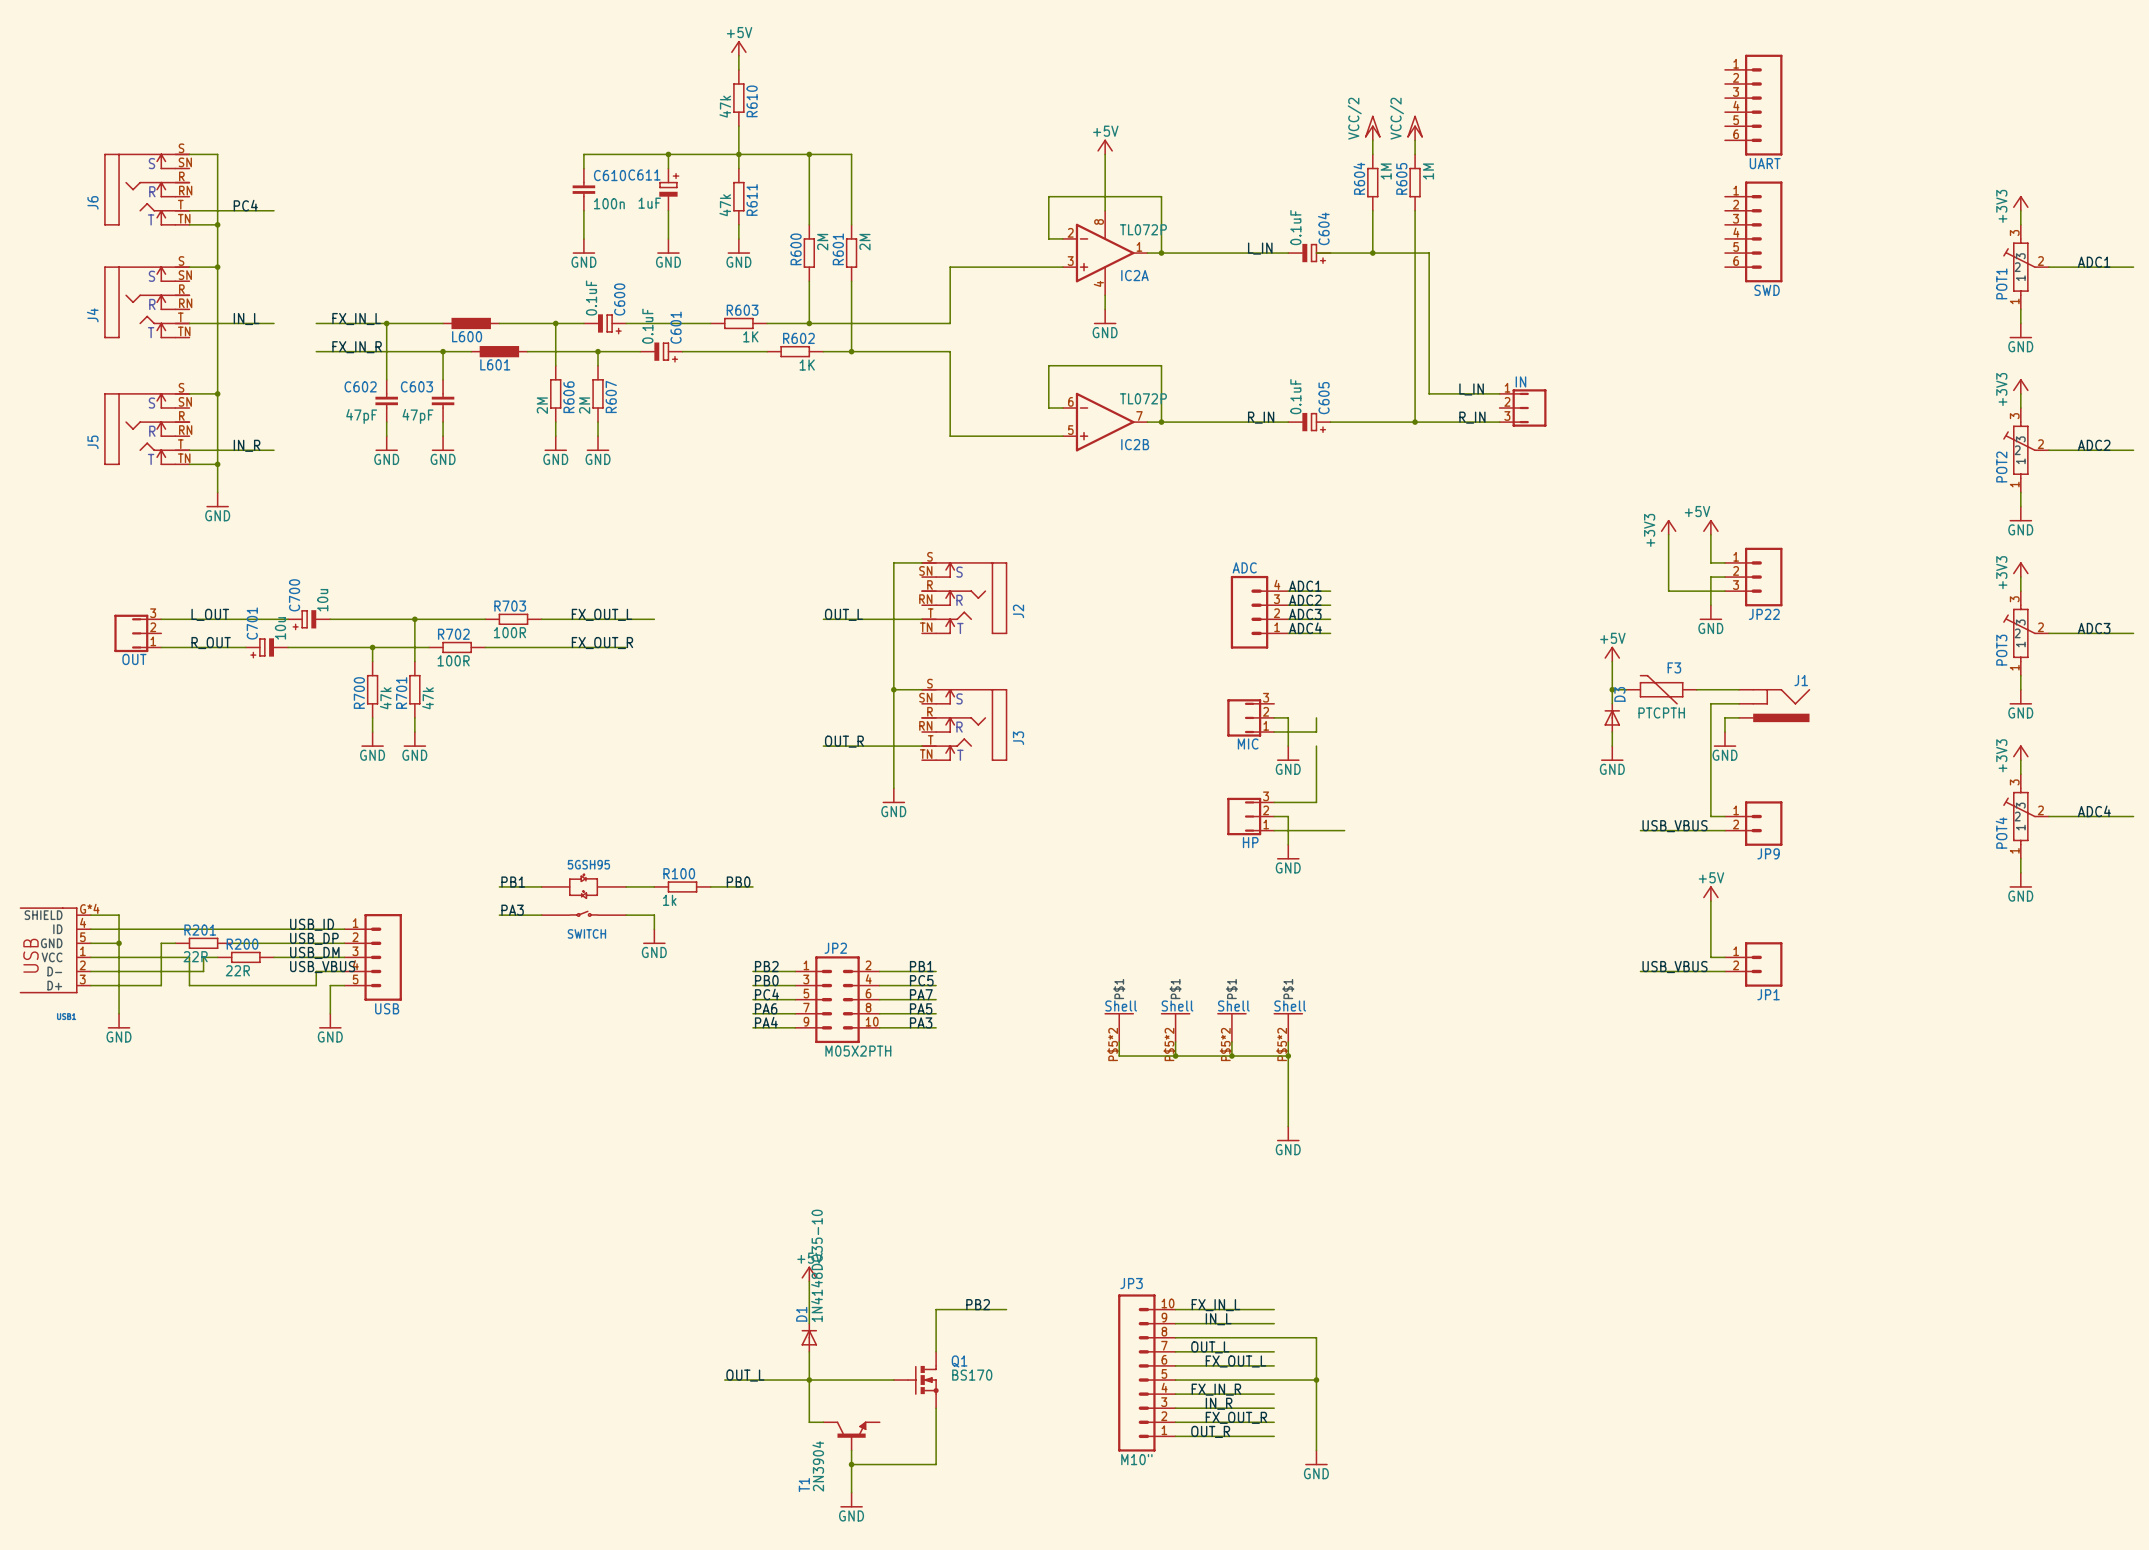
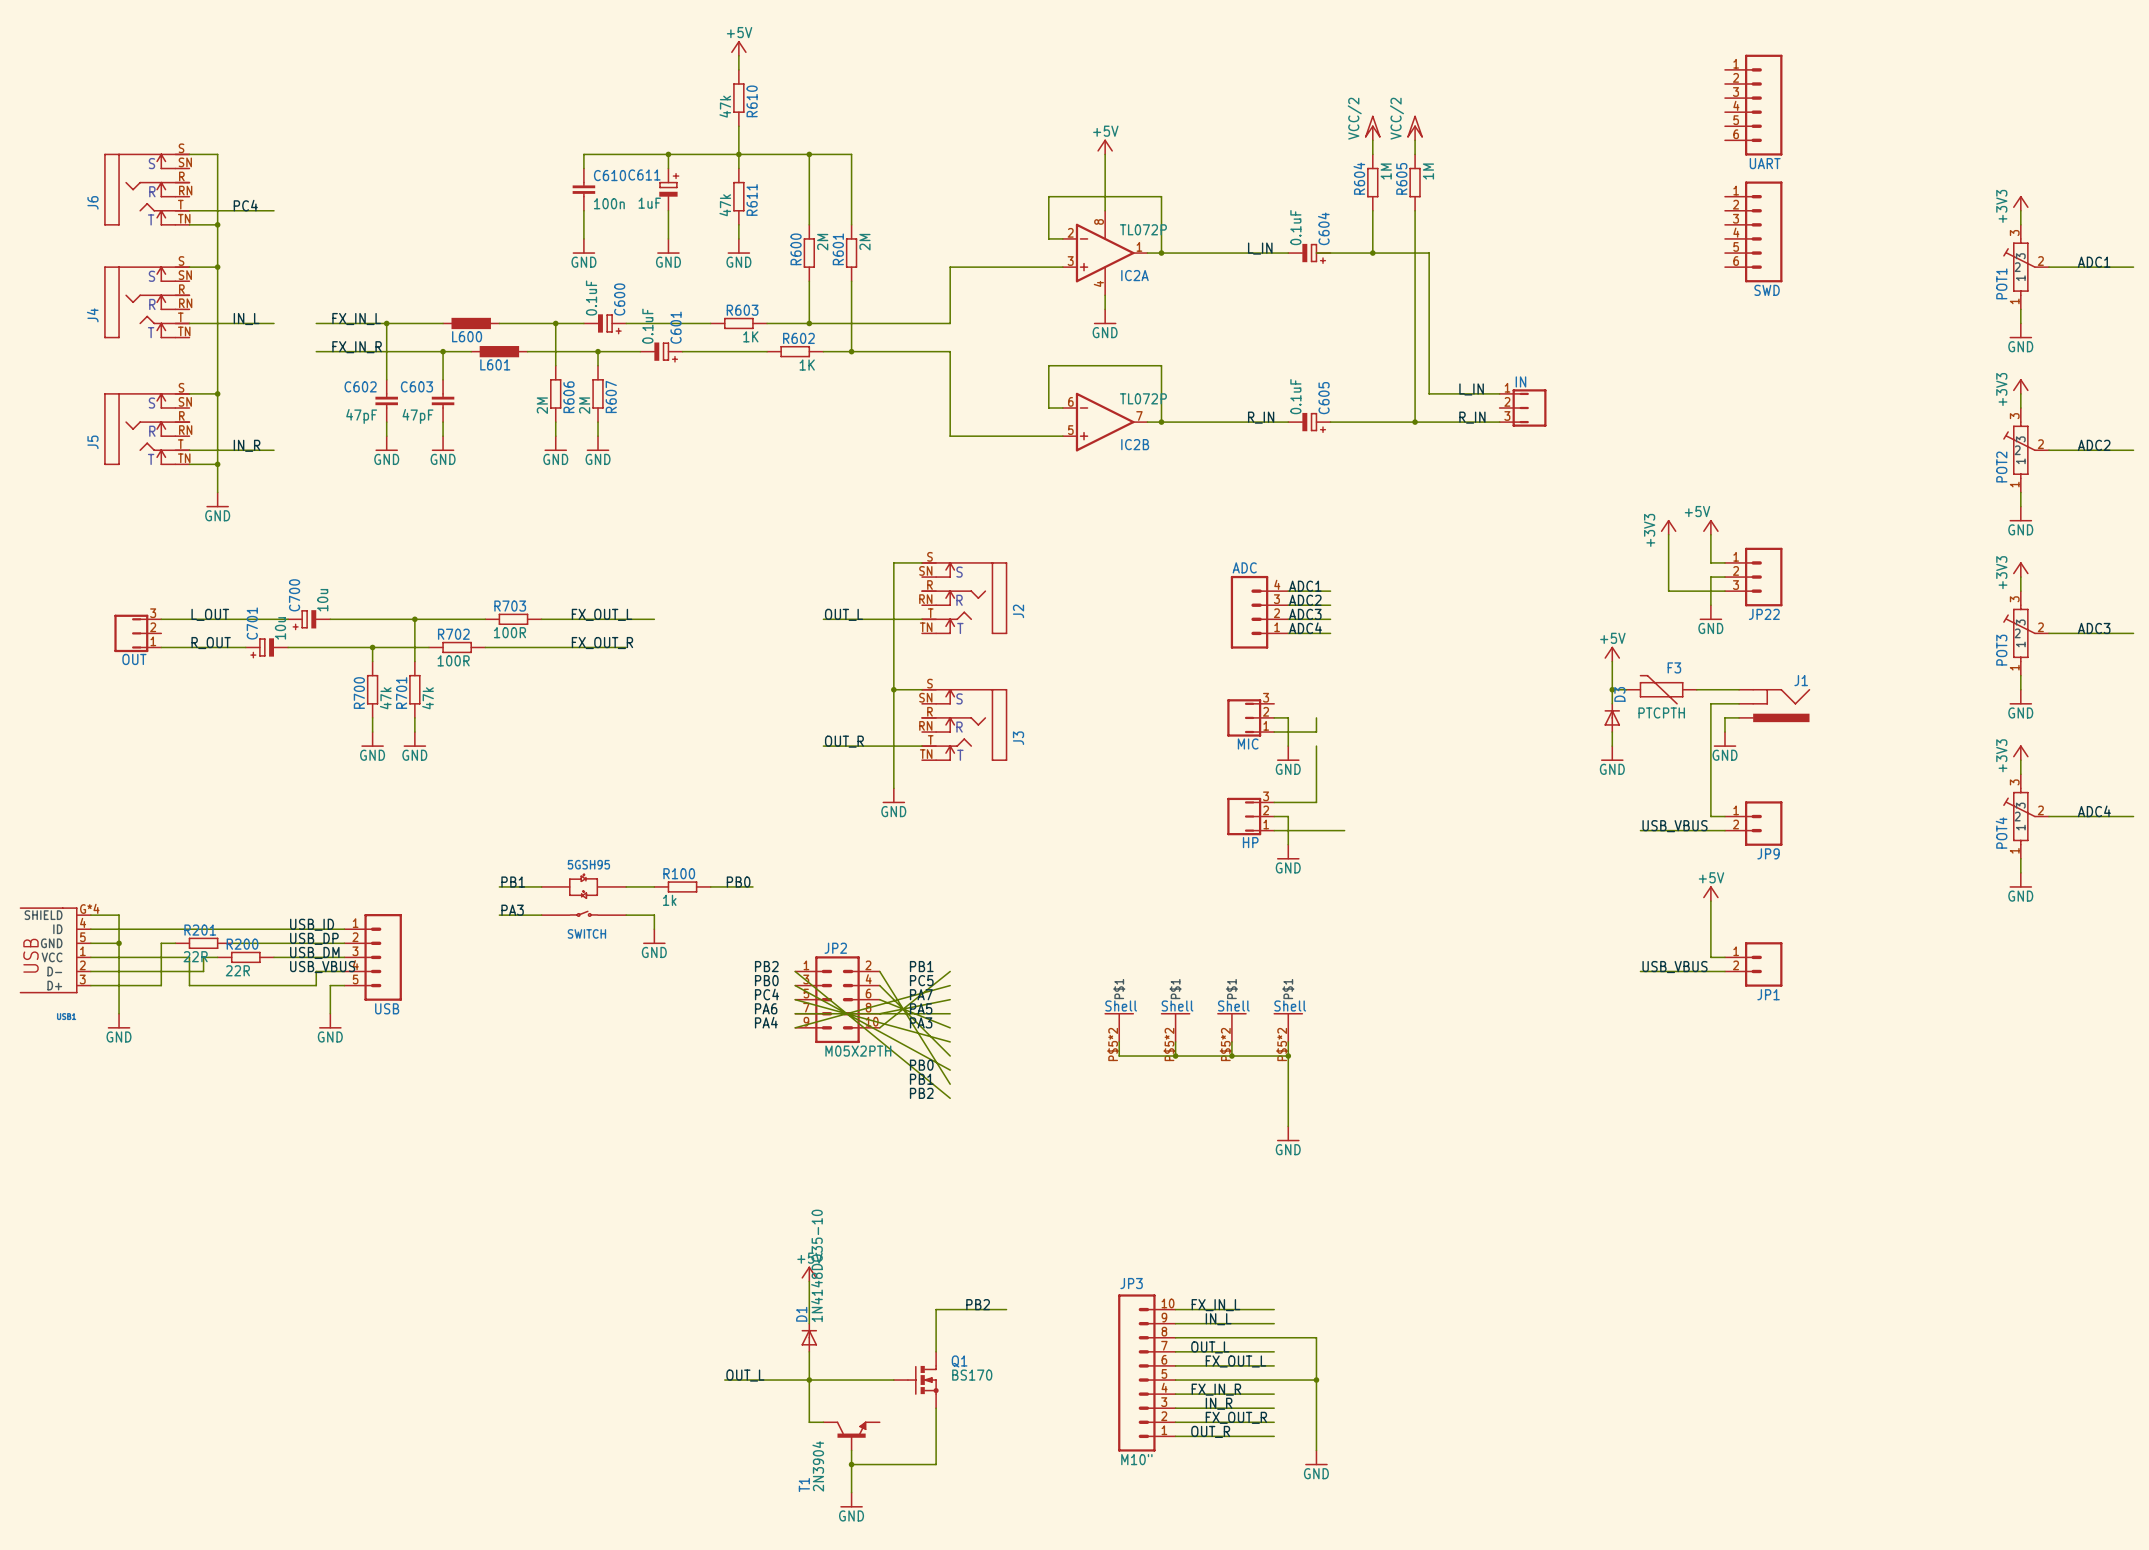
wire: (752, 971) (795, 971) -> (950, 1098) (795, 971)
wire: (879, 971) (936, 971) -> (879, 971) (950, 1084)
wire: (752, 985) (795, 985) -> (950, 1070) (795, 985)
wire: (879, 985) (936, 985) -> (879, 985) (950, 1056)
wire: (752, 999) (795, 999) -> (950, 1041) (795, 999)
wire: (879, 999) (936, 999) -> (879, 999) (950, 1027)
wire: (752, 1013) (795, 1013) -> (950, 999) (879, 1013) (795, 1013)
wire: none -> (936, 1013) (950, 1013)
wire: (752, 1027) (795, 1027) -> (950, 985) (795, 1027)
wire: (879, 1027) (936, 1027) -> (879, 1027) (950, 971)
label: none -> PB0 (921, 1065)
label: none -> PB1 (921, 1079)
label: none -> PB2 (921, 1093)

